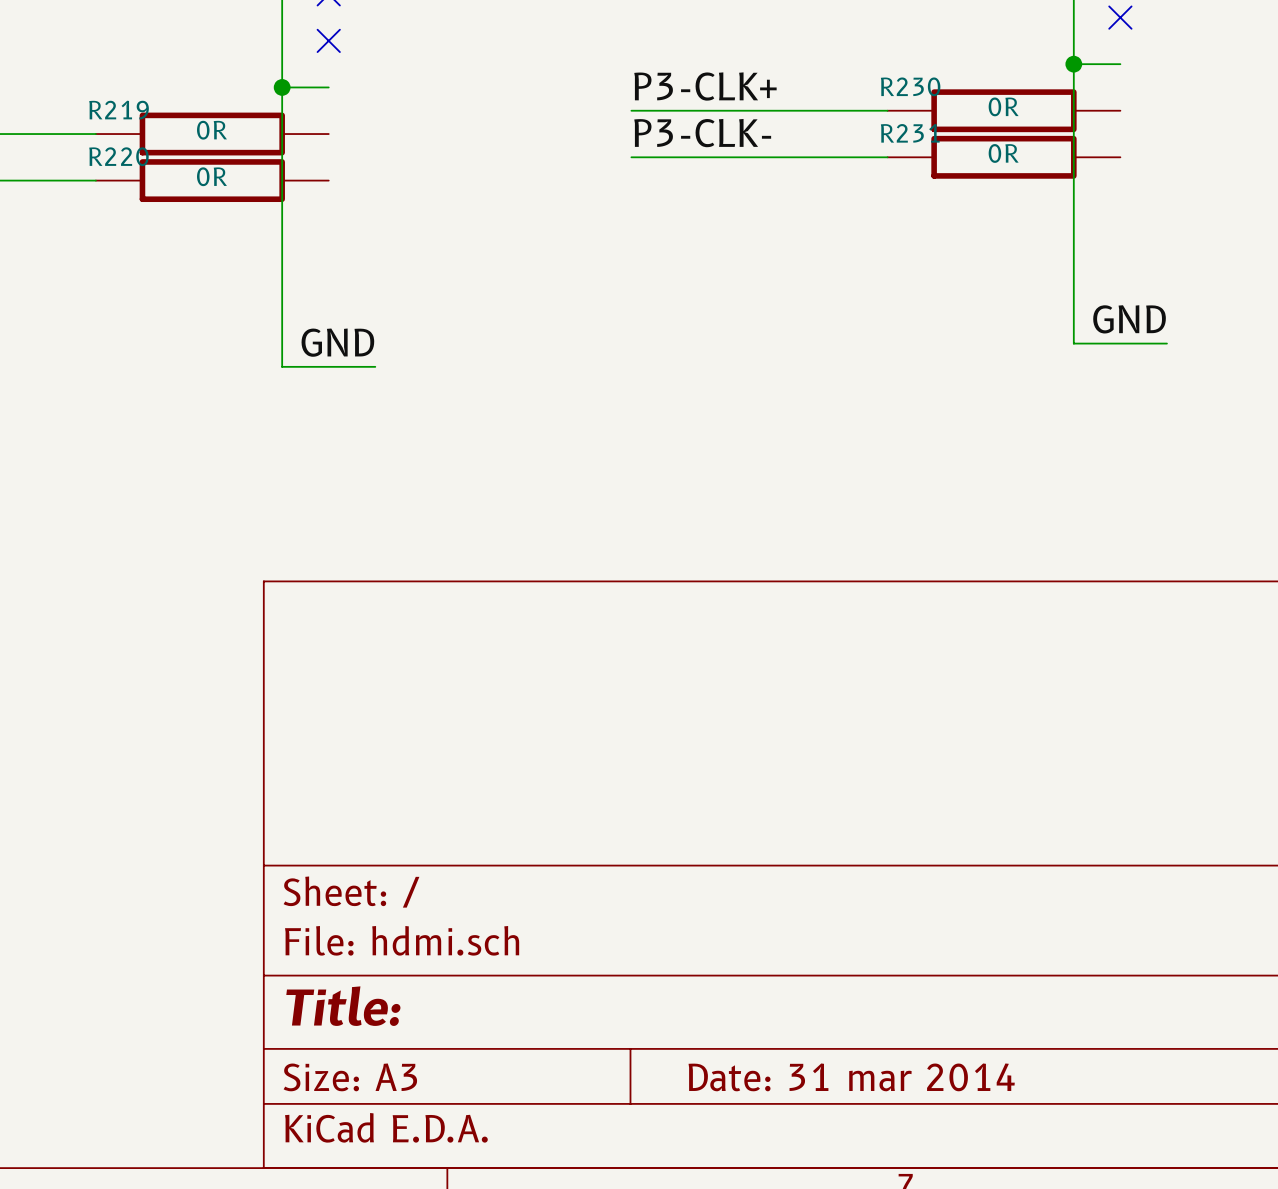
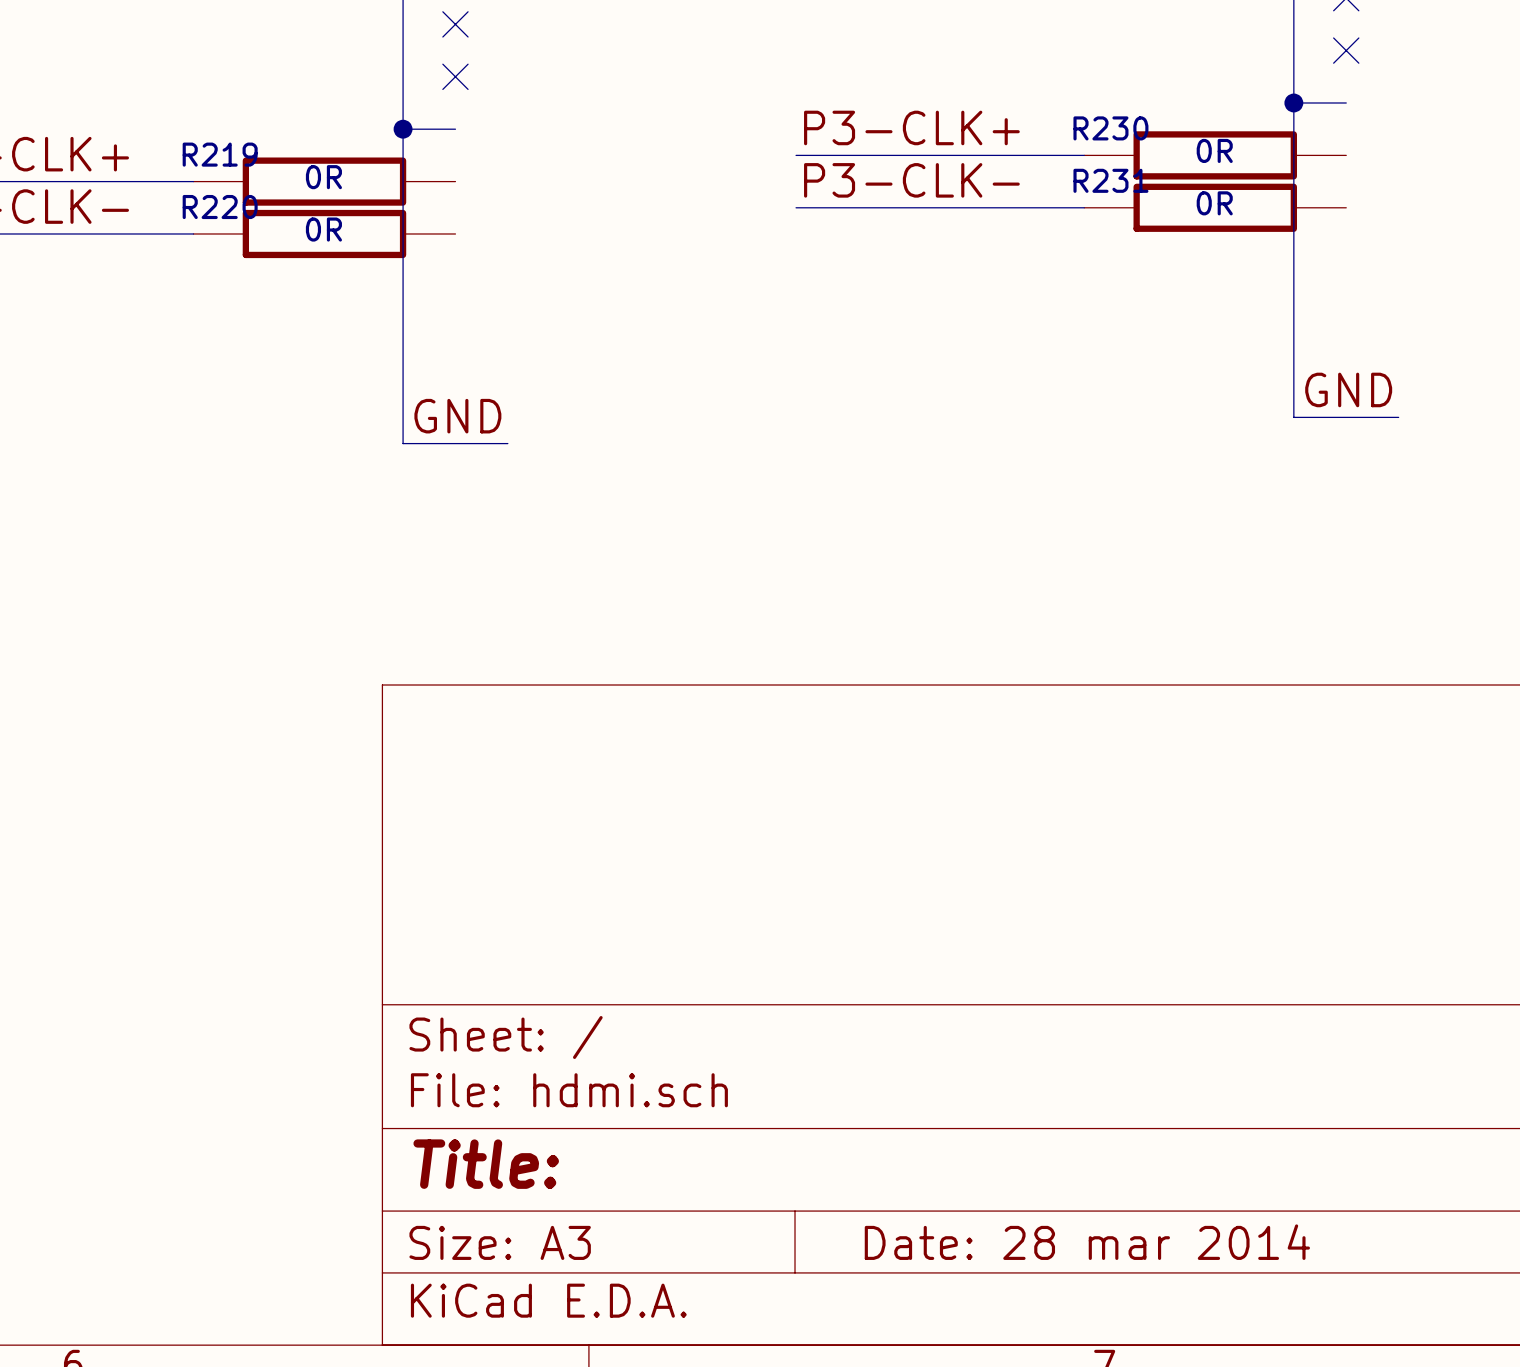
title block: Date: 31 mar 2014 (851, 1077) -> Date: 28 mar 2014 (1087, 1242)

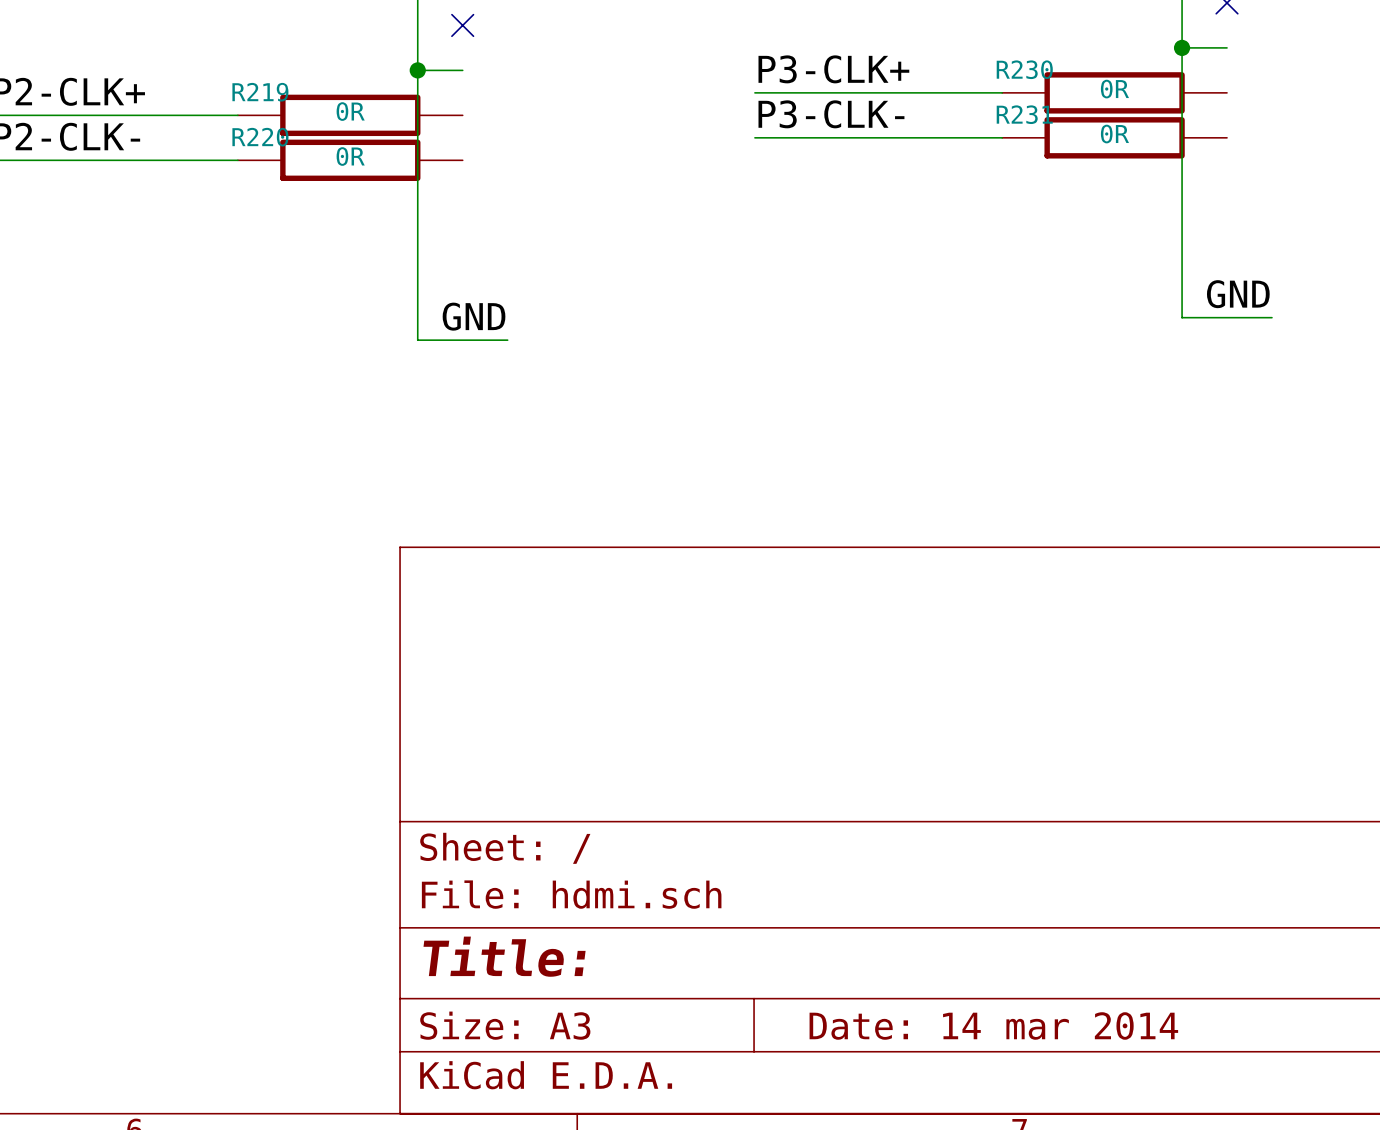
title block: Date: 28 mar 2014 (1087, 1242) -> Date: 14 mar 2014 (993, 1025)

